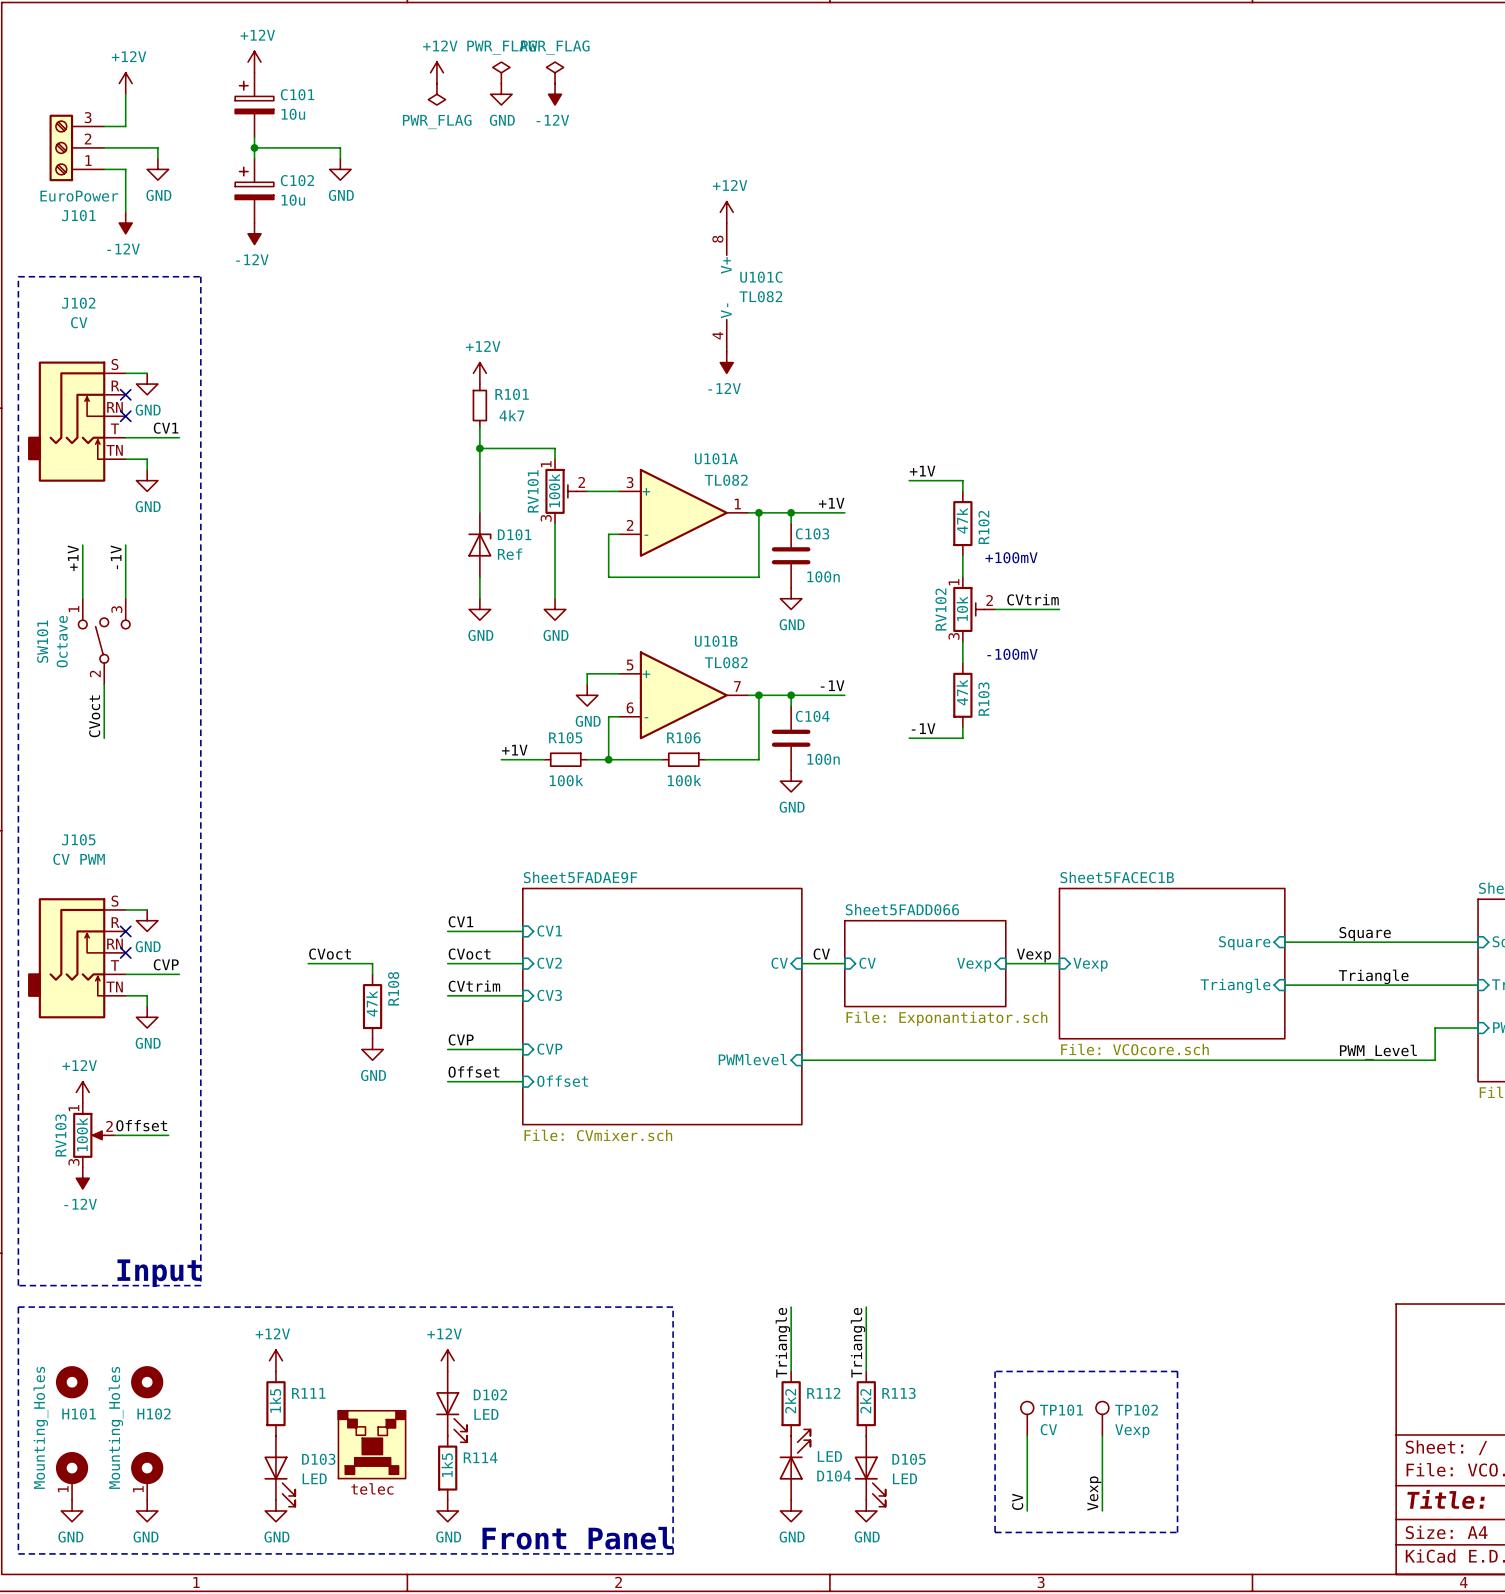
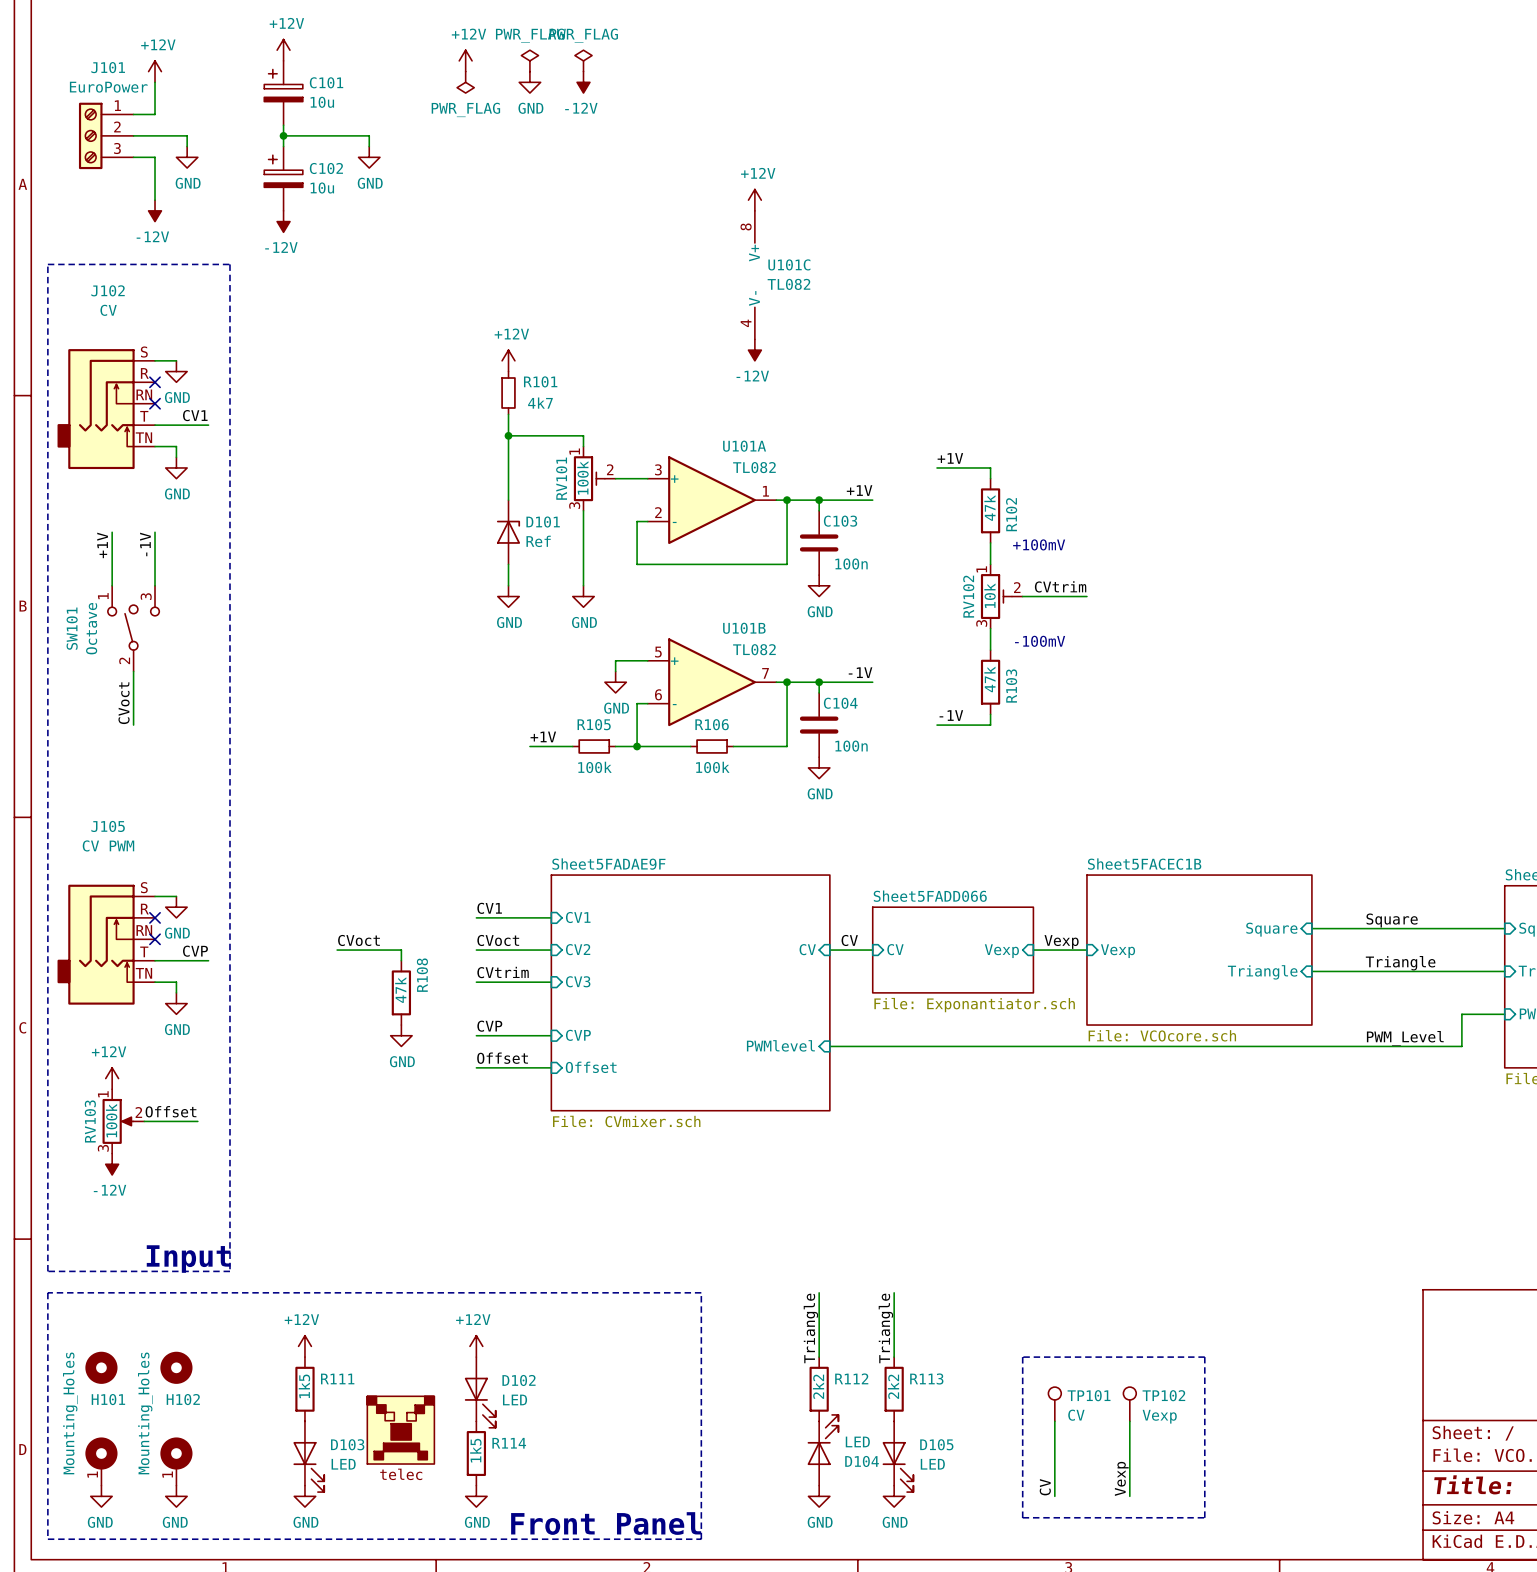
J101 flip: as is (61, 147) -> up-down (90, 135)

